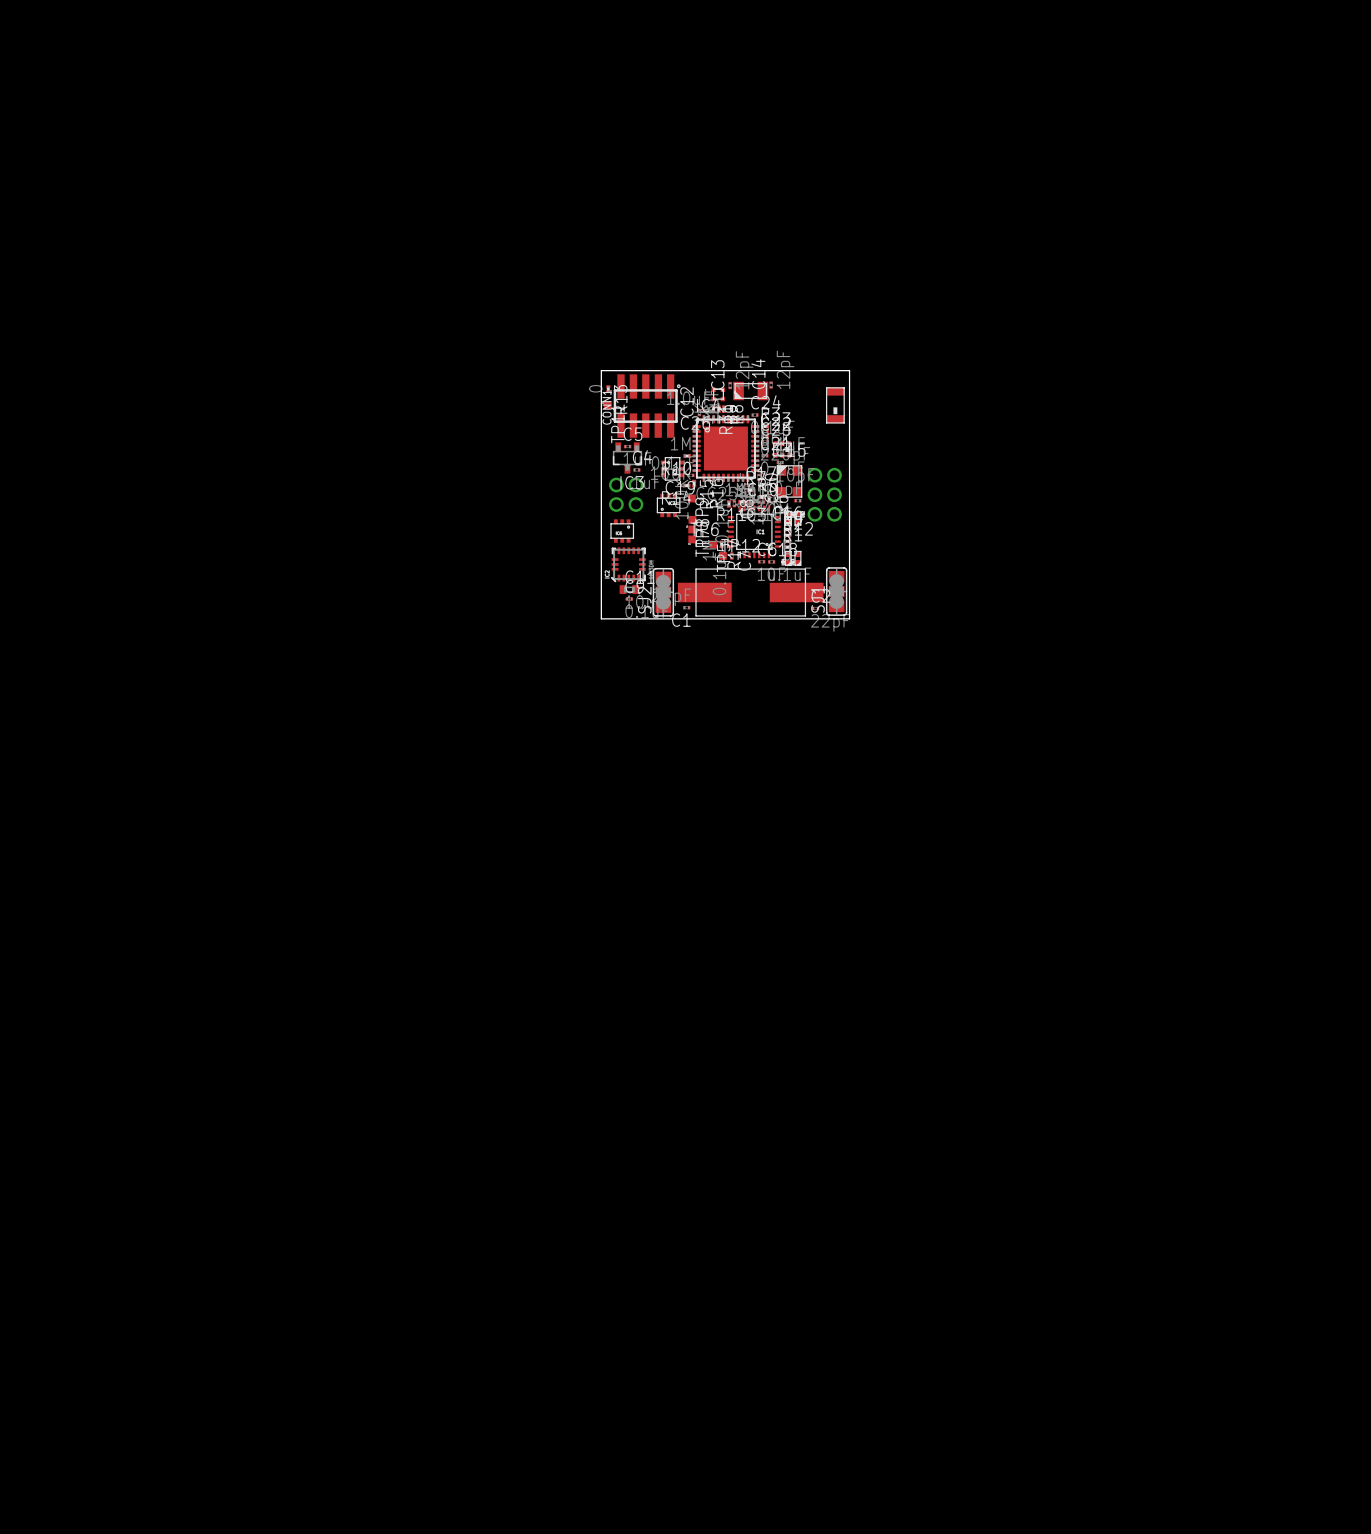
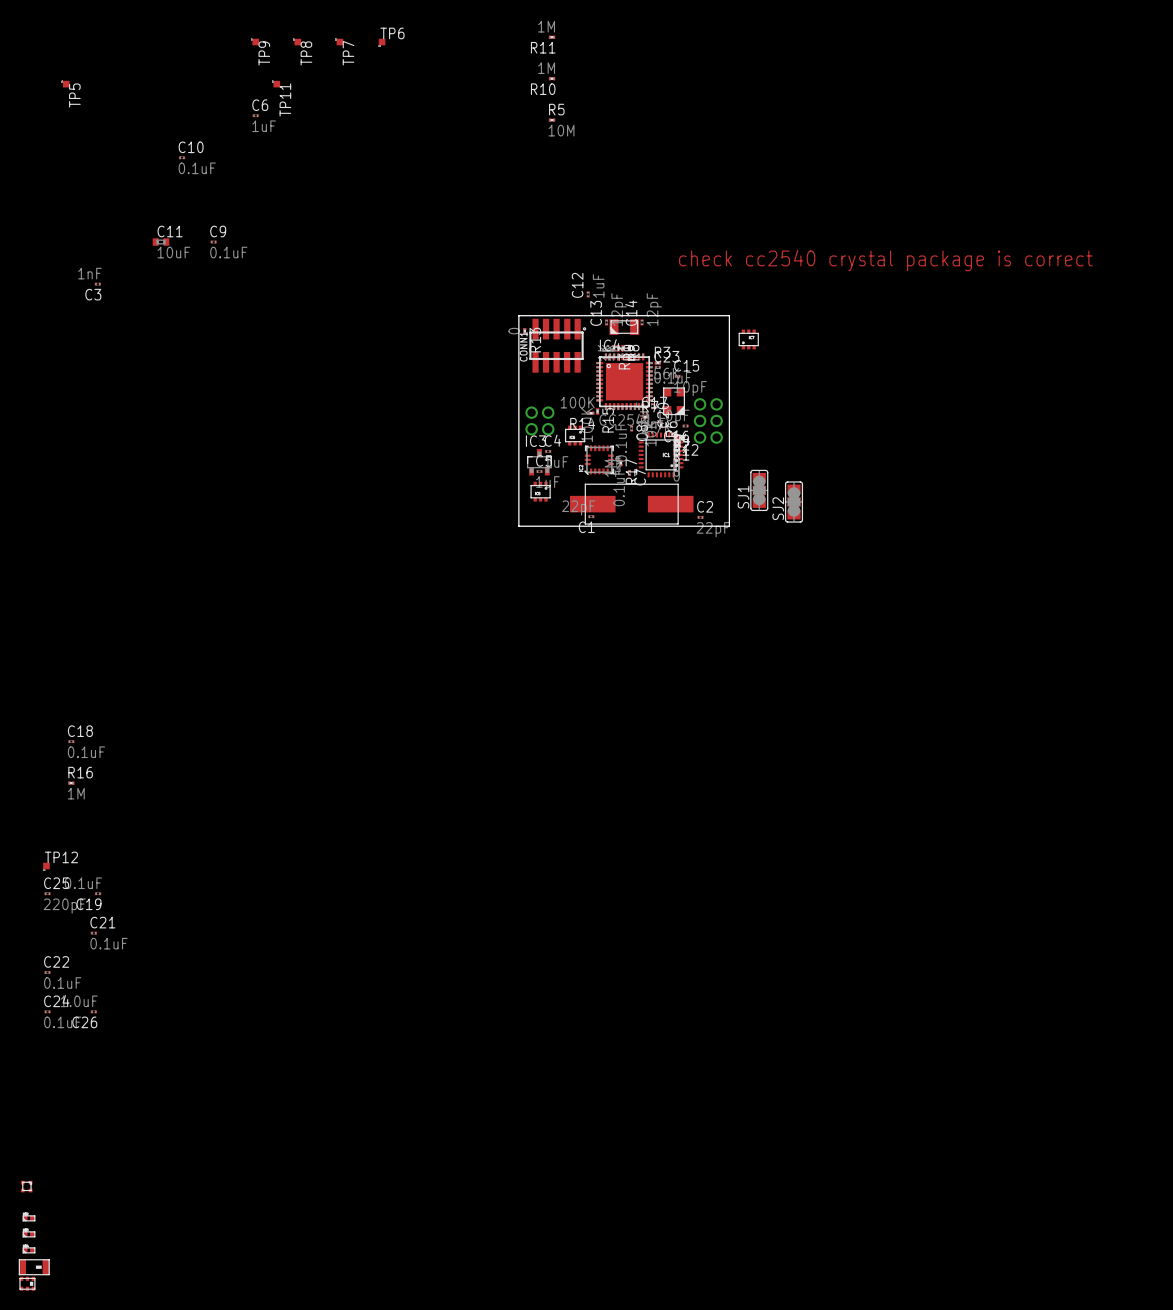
text: none -> check cc2540 crystal package is correct (885, 260)
C13 position: (730, 385) -> (606, 322)
C14 position: (771, 385) -> (642, 322)
part position: (750, 391) -> (624, 327)
part: (718, 394) -> none
TP11 position: (607, 405) -> (276, 84)
part: (835, 405) -> none
C26 position: (706, 410) -> (93, 1011)
C12 position: (699, 412) -> (588, 294)
C24 position: (754, 415) -> (47, 1011)
C22 position: (765, 436) -> (47, 972)
C25 position: (765, 441) -> (47, 893)
C5 position: (627, 446) -> (539, 471)
part: (782, 449) -> none
C21 position: (764, 455) -> (93, 933)
R10 position: (687, 456) -> (552, 78)
IC3 rotation: 0° (627, 458) -> 180° (539, 462)
IC3 position: (627, 458) -> (539, 462)
C15 position: (780, 462) -> (677, 376)
part rotation: 0° (672, 468) -> 90° clockwise (540, 491)
part position: (672, 468) -> (540, 491)
C4 position: (636, 469) -> (548, 451)
C19 position: (690, 475) -> (98, 893)
part rotation: 0° (789, 481) -> 180° (674, 401)
R5 position: (761, 497) -> (552, 120)
TP9 position: (691, 498) -> (255, 42)
R11 position: (741, 501) -> (552, 37)
C10 position: (752, 501) -> (182, 157)
C3 position: (761, 502) -> (97, 284)
R16 rotation: 0° (729, 503) -> 90° clockwise (71, 783)
R16 position: (729, 503) -> (71, 783)
part position: (668, 505) -> (748, 339)
part rotation: 0° (797, 518) -> 90° counterclockwise (29, 1218)
part position: (797, 518) -> (29, 1218)
TP8 position: (692, 519) -> (297, 42)
TP7 position: (692, 529) -> (339, 42)
part position: (622, 531) -> (575, 435)
part position: (754, 531) -> (661, 454)
TP6 position: (692, 539) -> (382, 42)
TP5 position: (713, 544) -> (66, 84)
TP12 position: (722, 555) -> (46, 866)
part rotation: 0° (788, 558) -> 90° clockwise (29, 1250)
part position: (788, 558) -> (29, 1250)
part rotation: 0° (797, 558) -> 90° clockwise (29, 1234)
part position: (797, 558) -> (29, 1234)
C6 position: (761, 561) -> (255, 115)
C18 position: (771, 561) -> (71, 741)
part position: (628, 564) -> (599, 460)
C11 position: (629, 589) -> (161, 242)
SJ1 position: (836, 591) -> (759, 490)
SJ2 position: (663, 592) -> (794, 502)
part position: (750, 592) -> (631, 504)
C9 position: (629, 598) -> (213, 242)
part: none -> (26, 1186)
part: none -> (34, 1267)
part: none -> (27, 1283)

